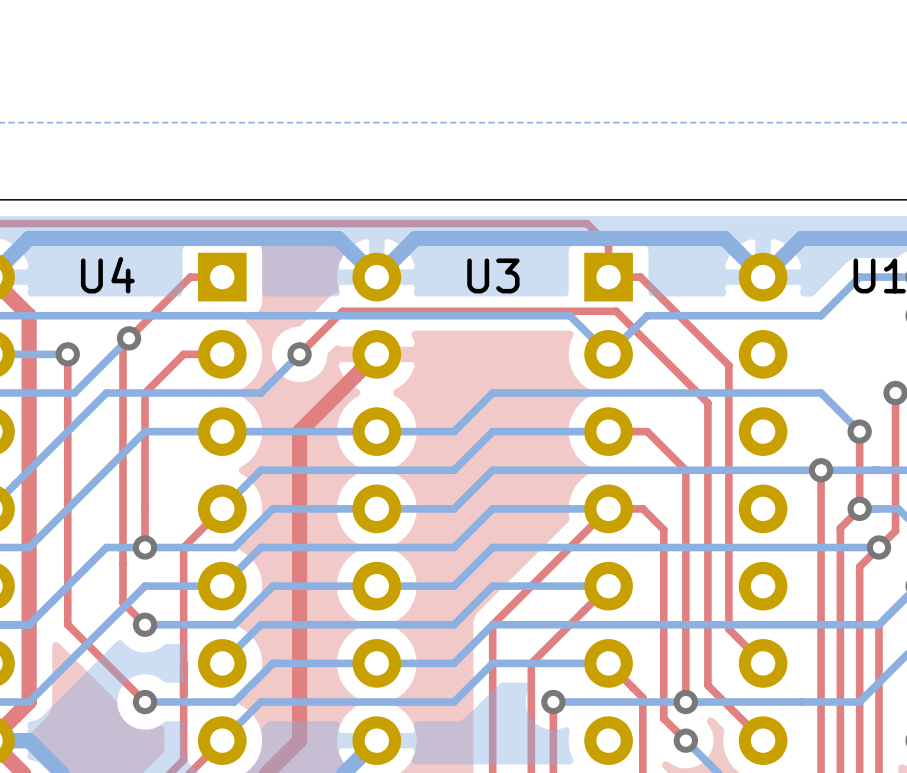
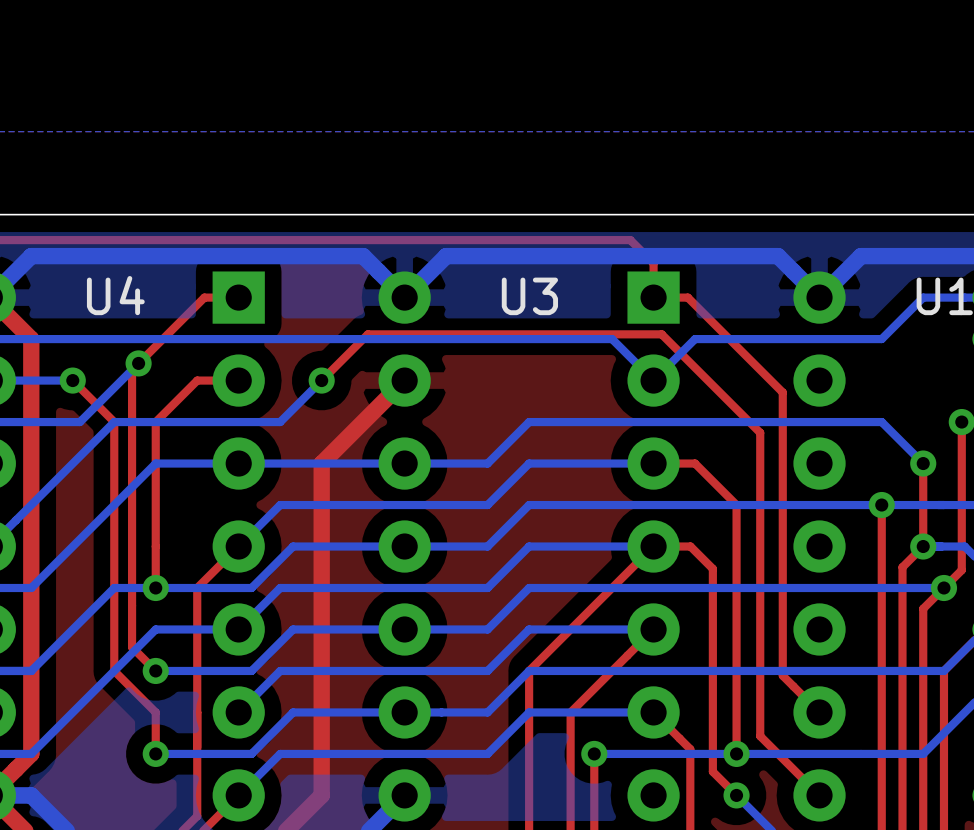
top track: (67, 354) (67, 624) (145, 702) -> (72, 380) (114, 422) (114, 670) (155, 712) (155, 753)

